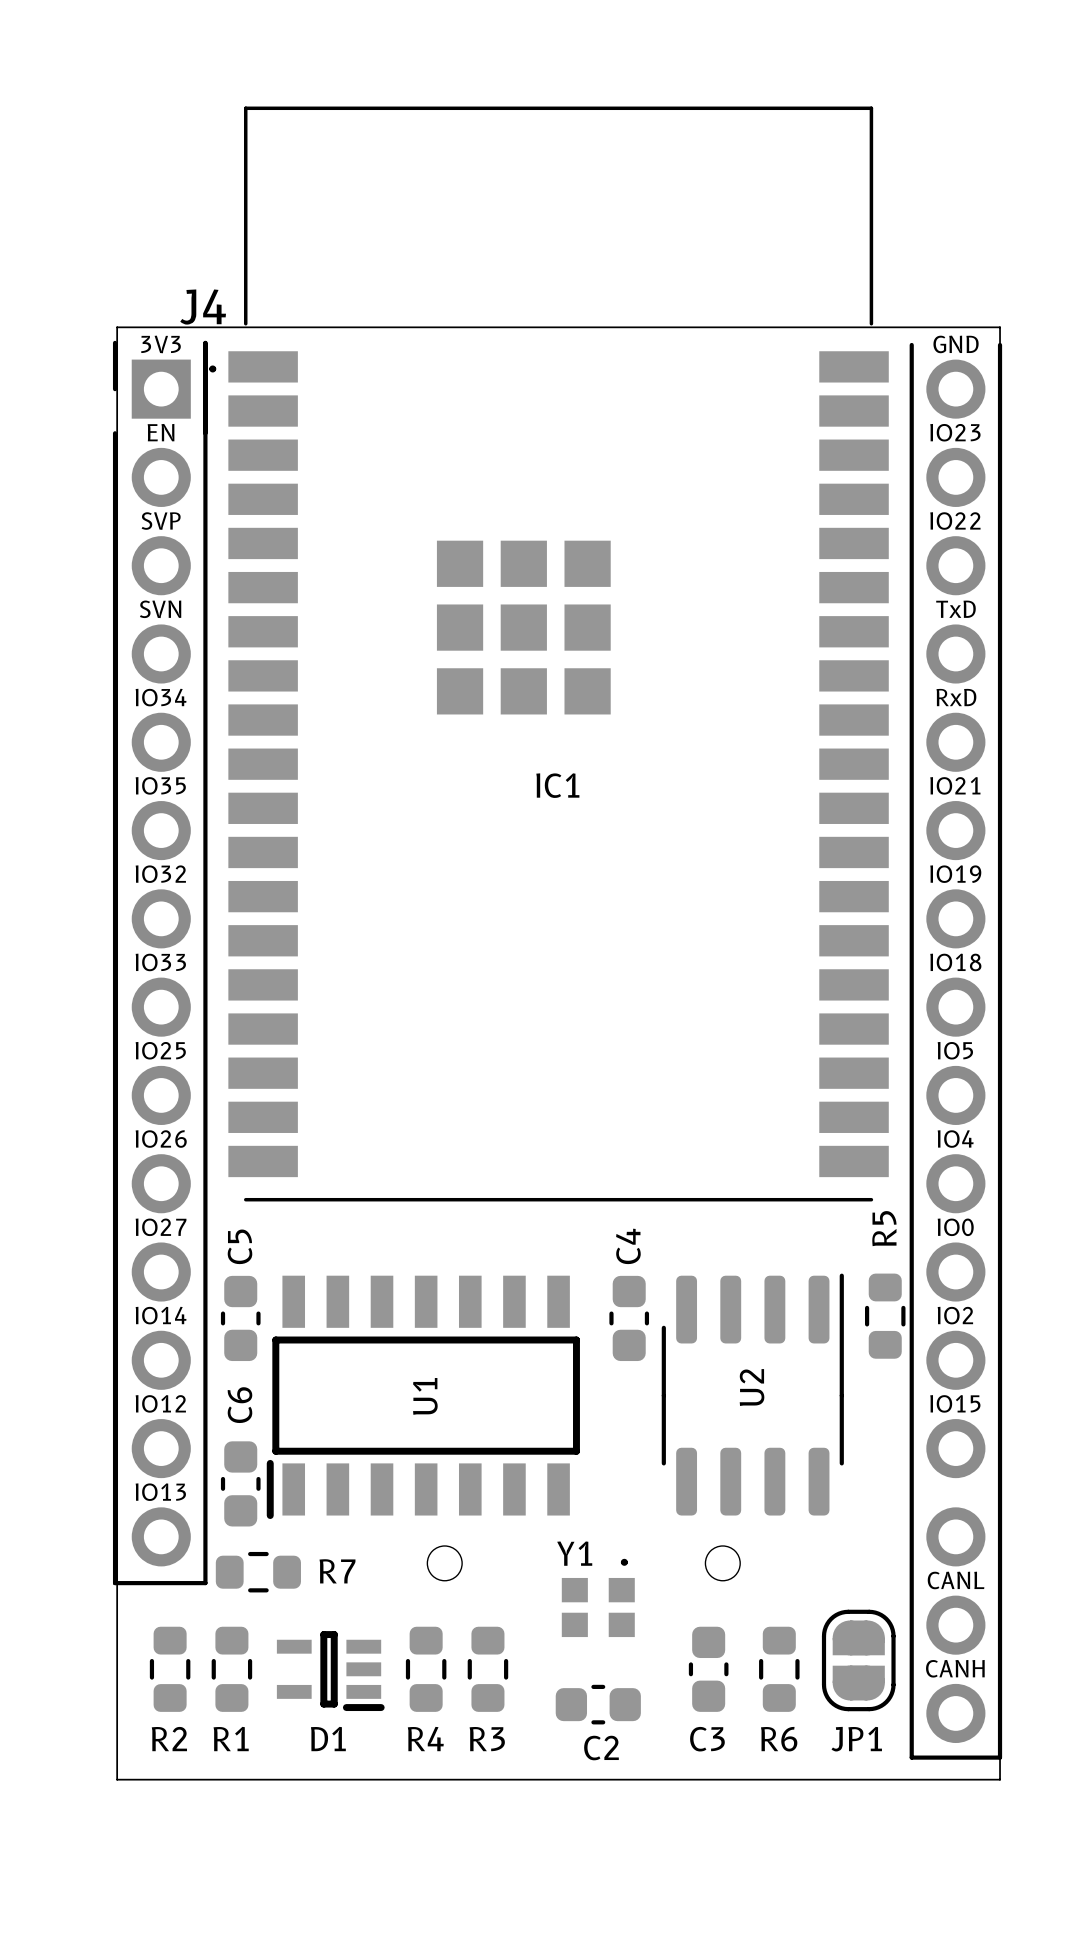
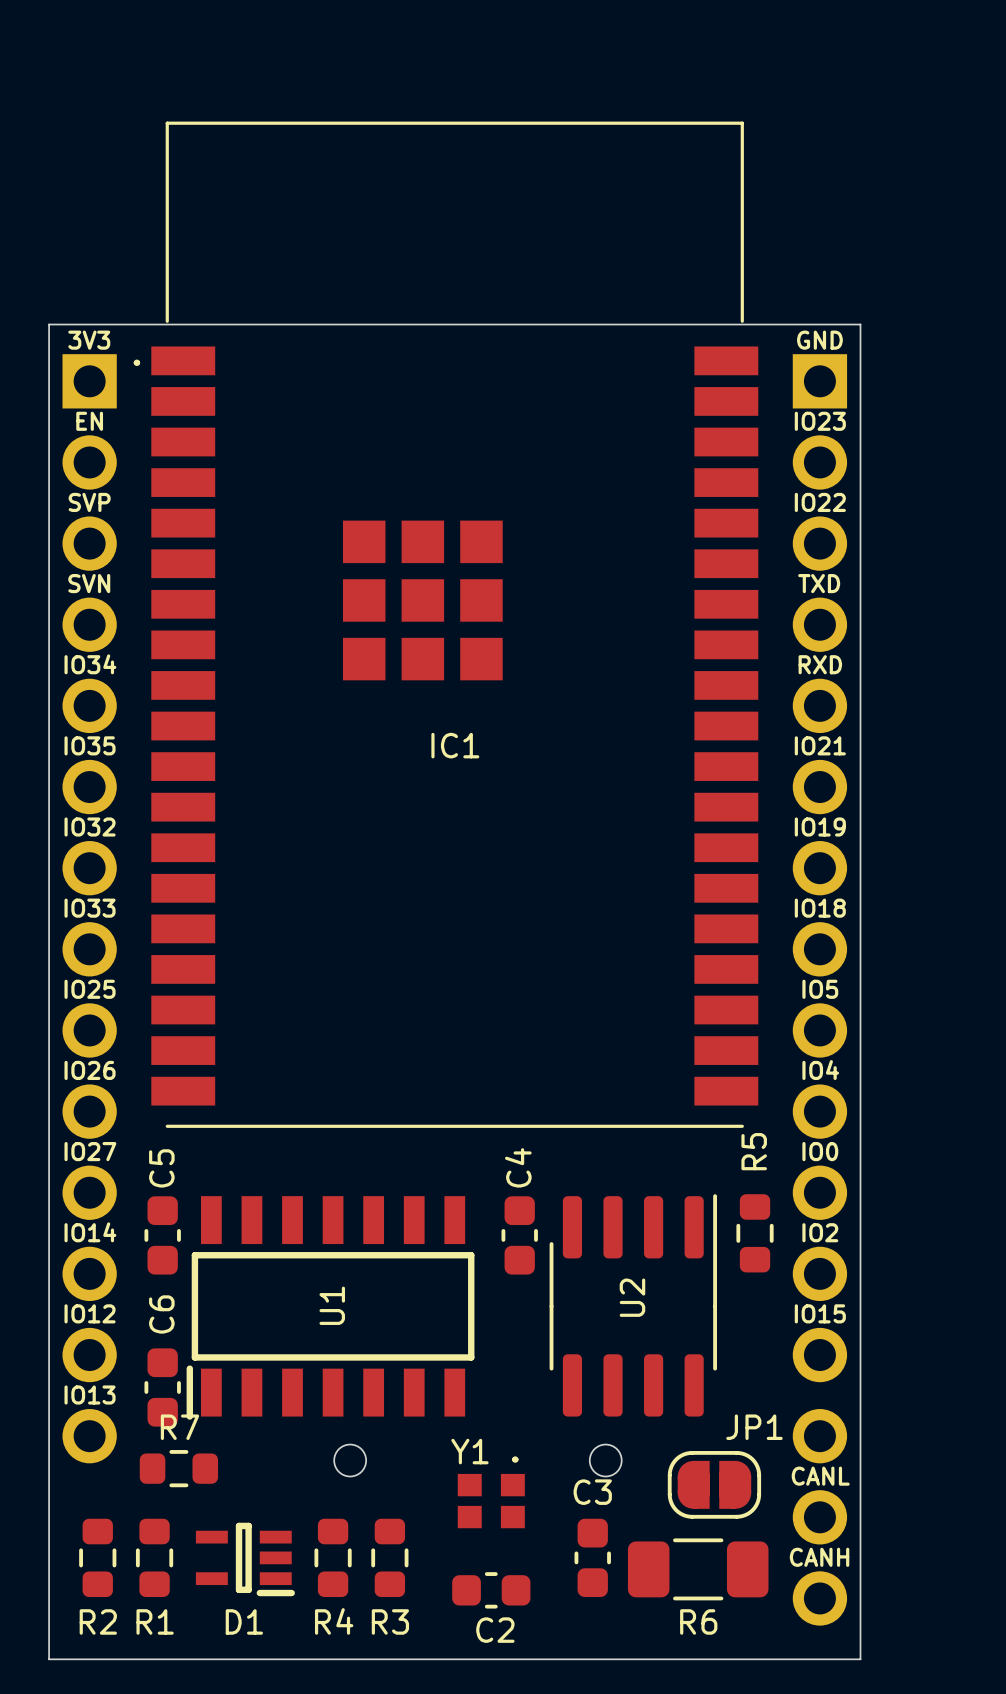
text: none -> TXD (819, 583)
text: none -> RXD (820, 664)
J4: (557, 1050) -> none
part: none -> (819, 989)
R7 name position: R7 (337, 1571) -> R7 (179, 1427)
R6 footprint: [759, 1626, 800, 1712] -> [627, 1538, 769, 1601]
JP1 rotation: 0° (858, 1660) -> 90° clockwise (714, 1484)
JP1 position: (858, 1660) -> (714, 1484)
C3 name position: C3 (707, 1739) -> C3 (592, 1492)
JP1 name position: JP1 (856, 1739) -> JP1 (754, 1427)

